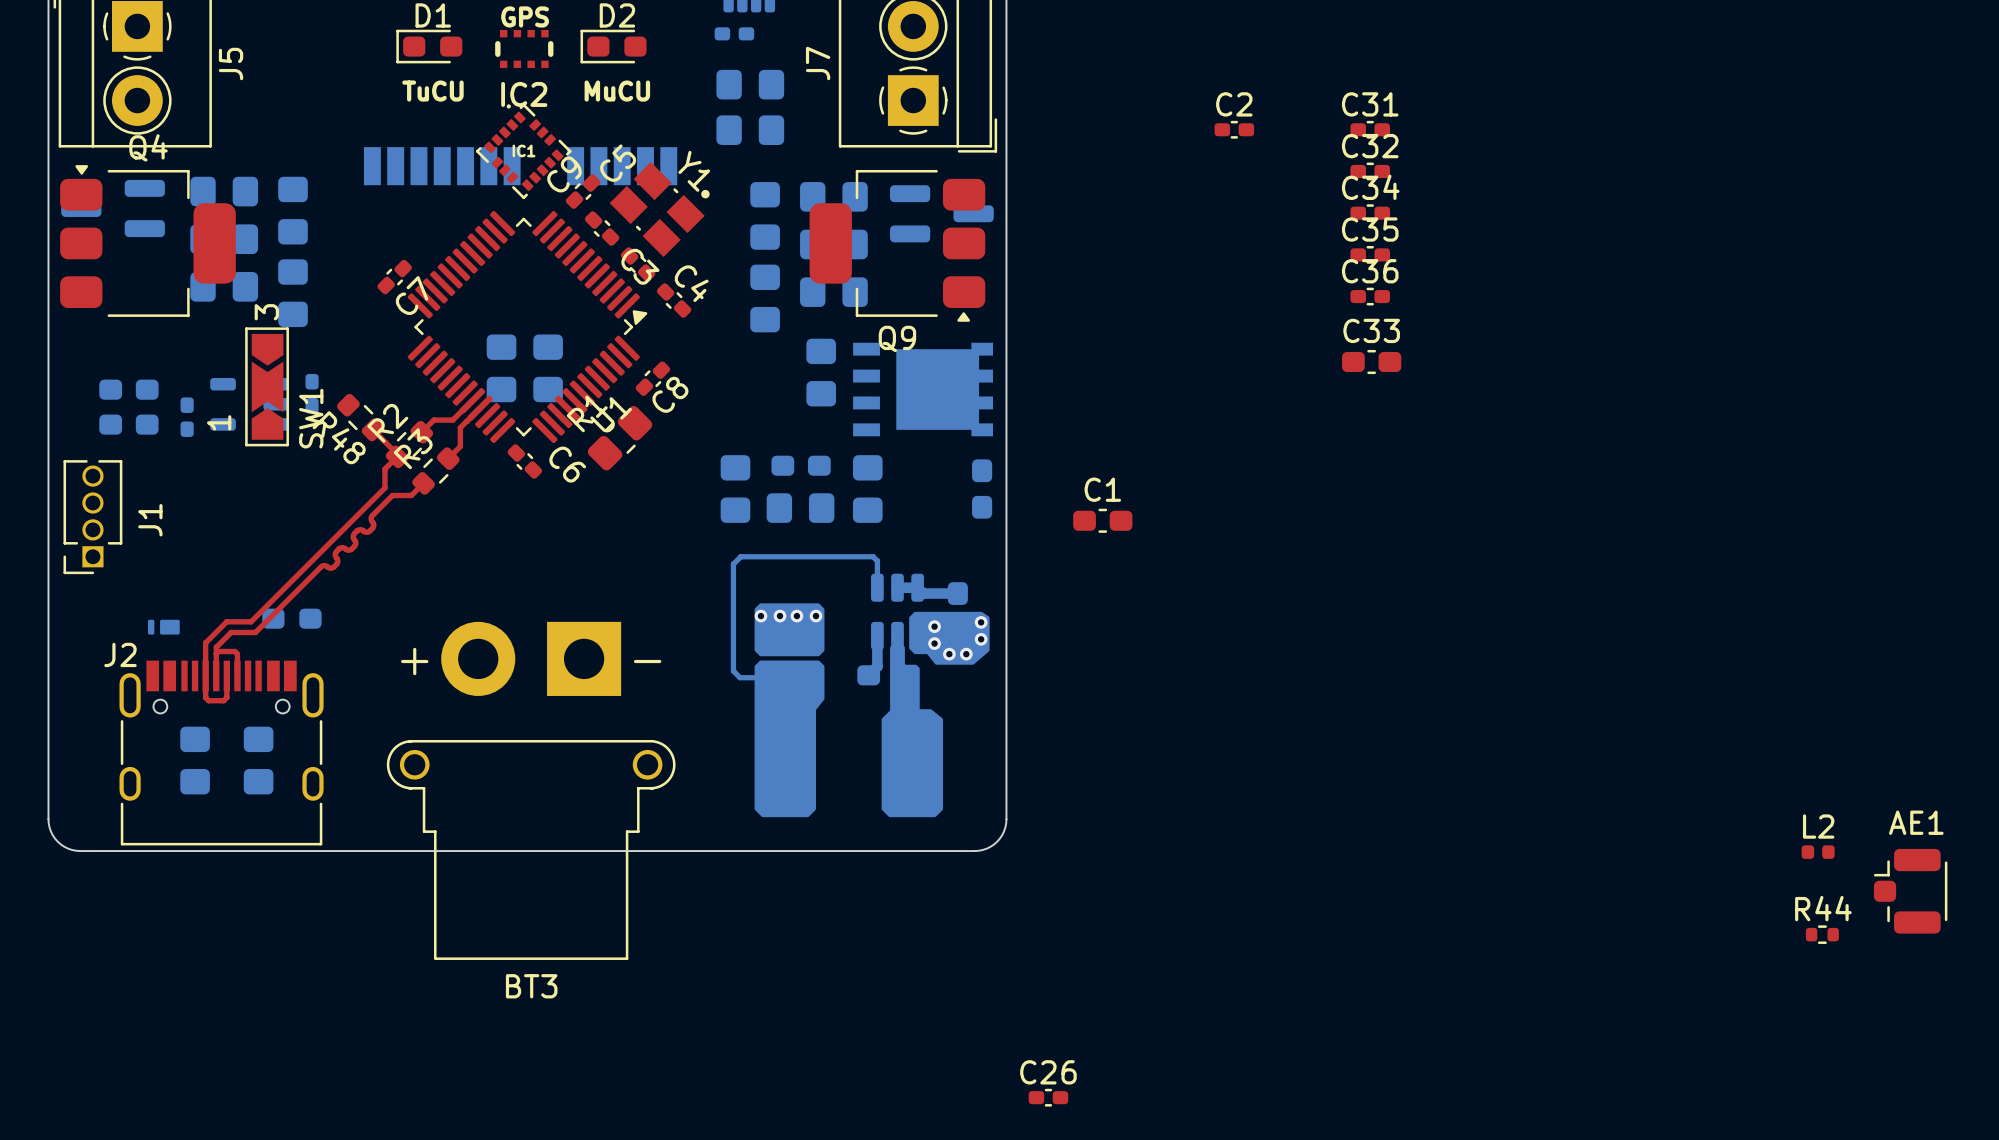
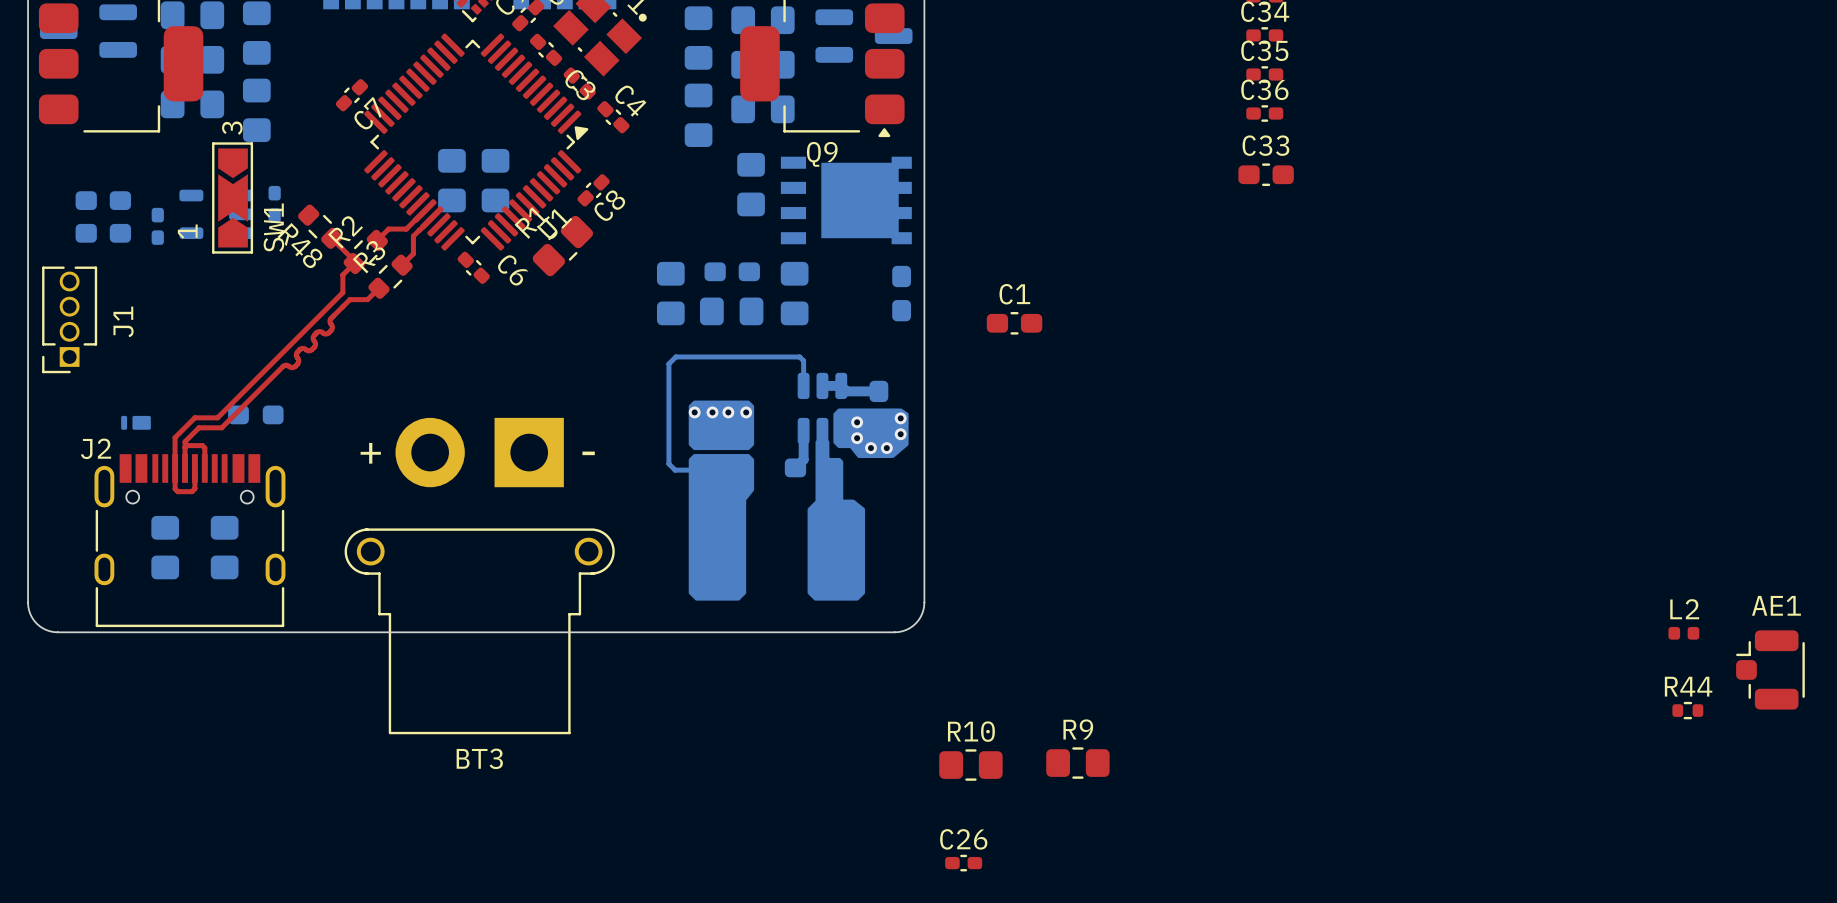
R9: none -> (1077, 763)
R10: none -> (970, 765)

